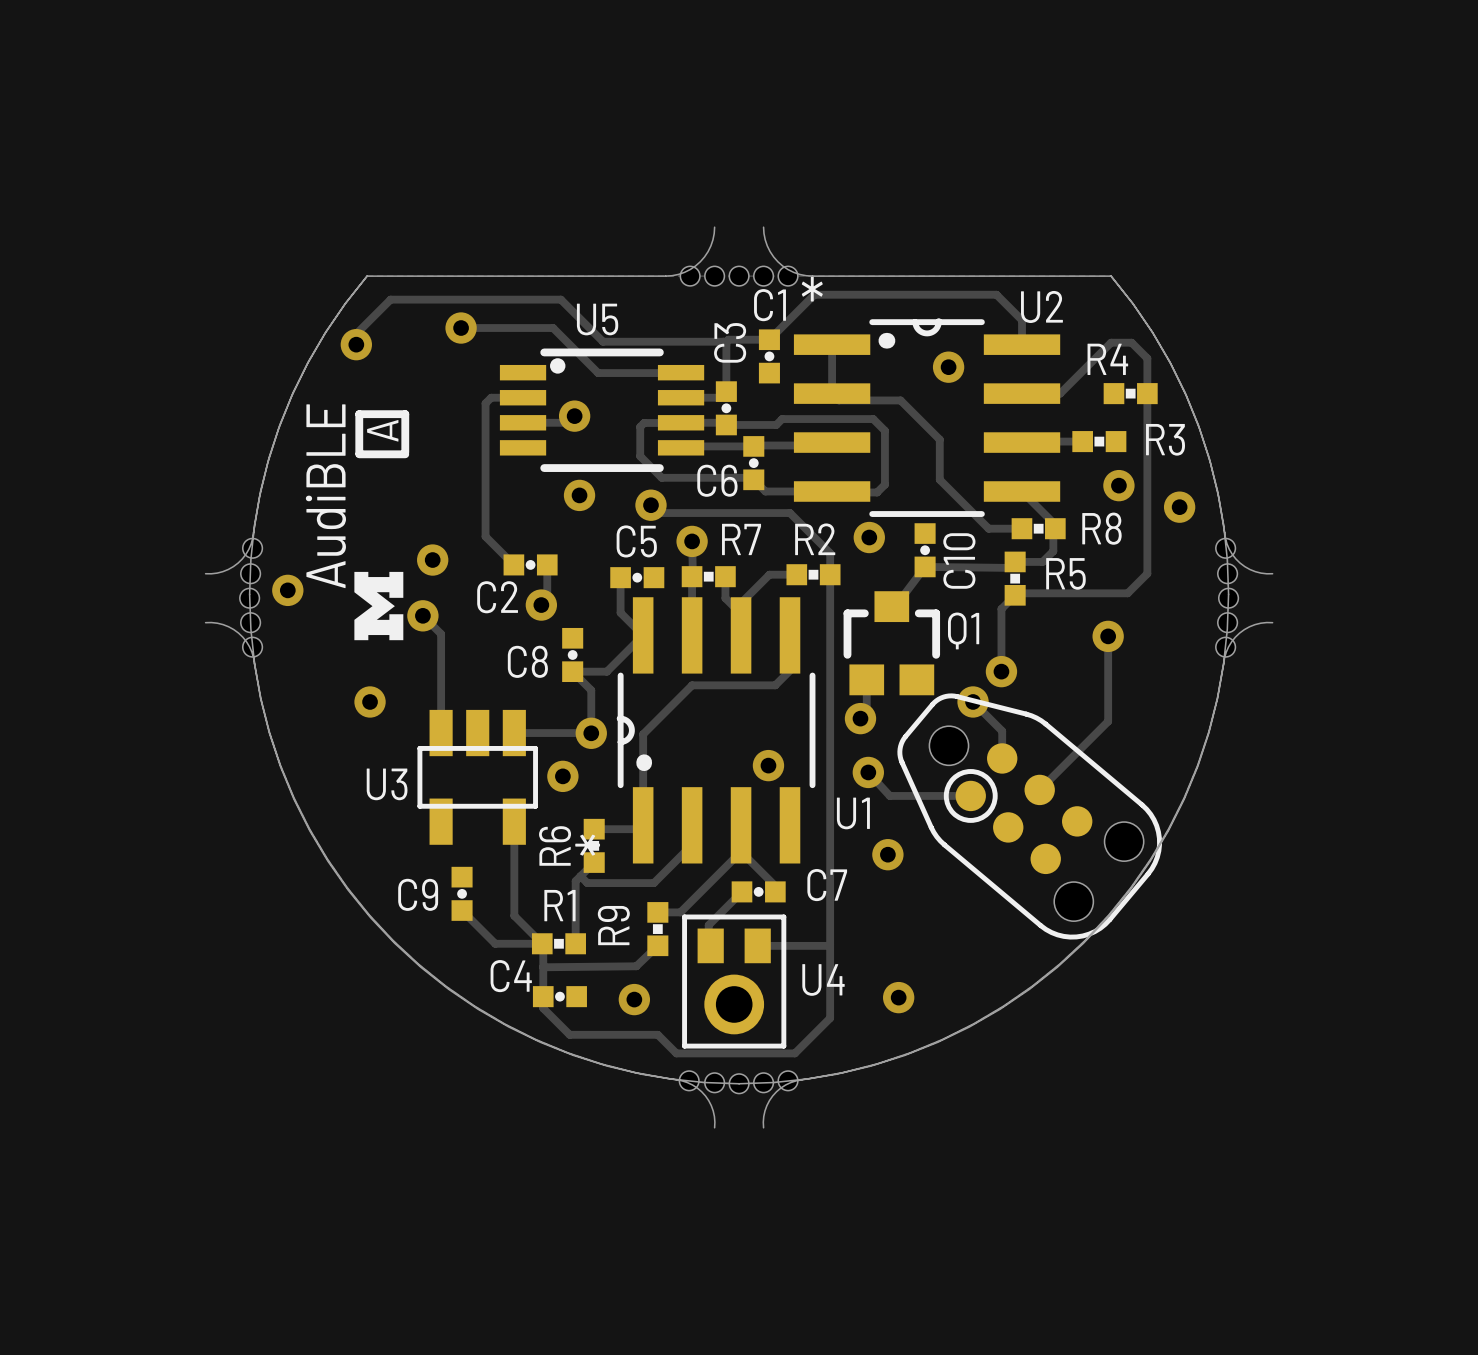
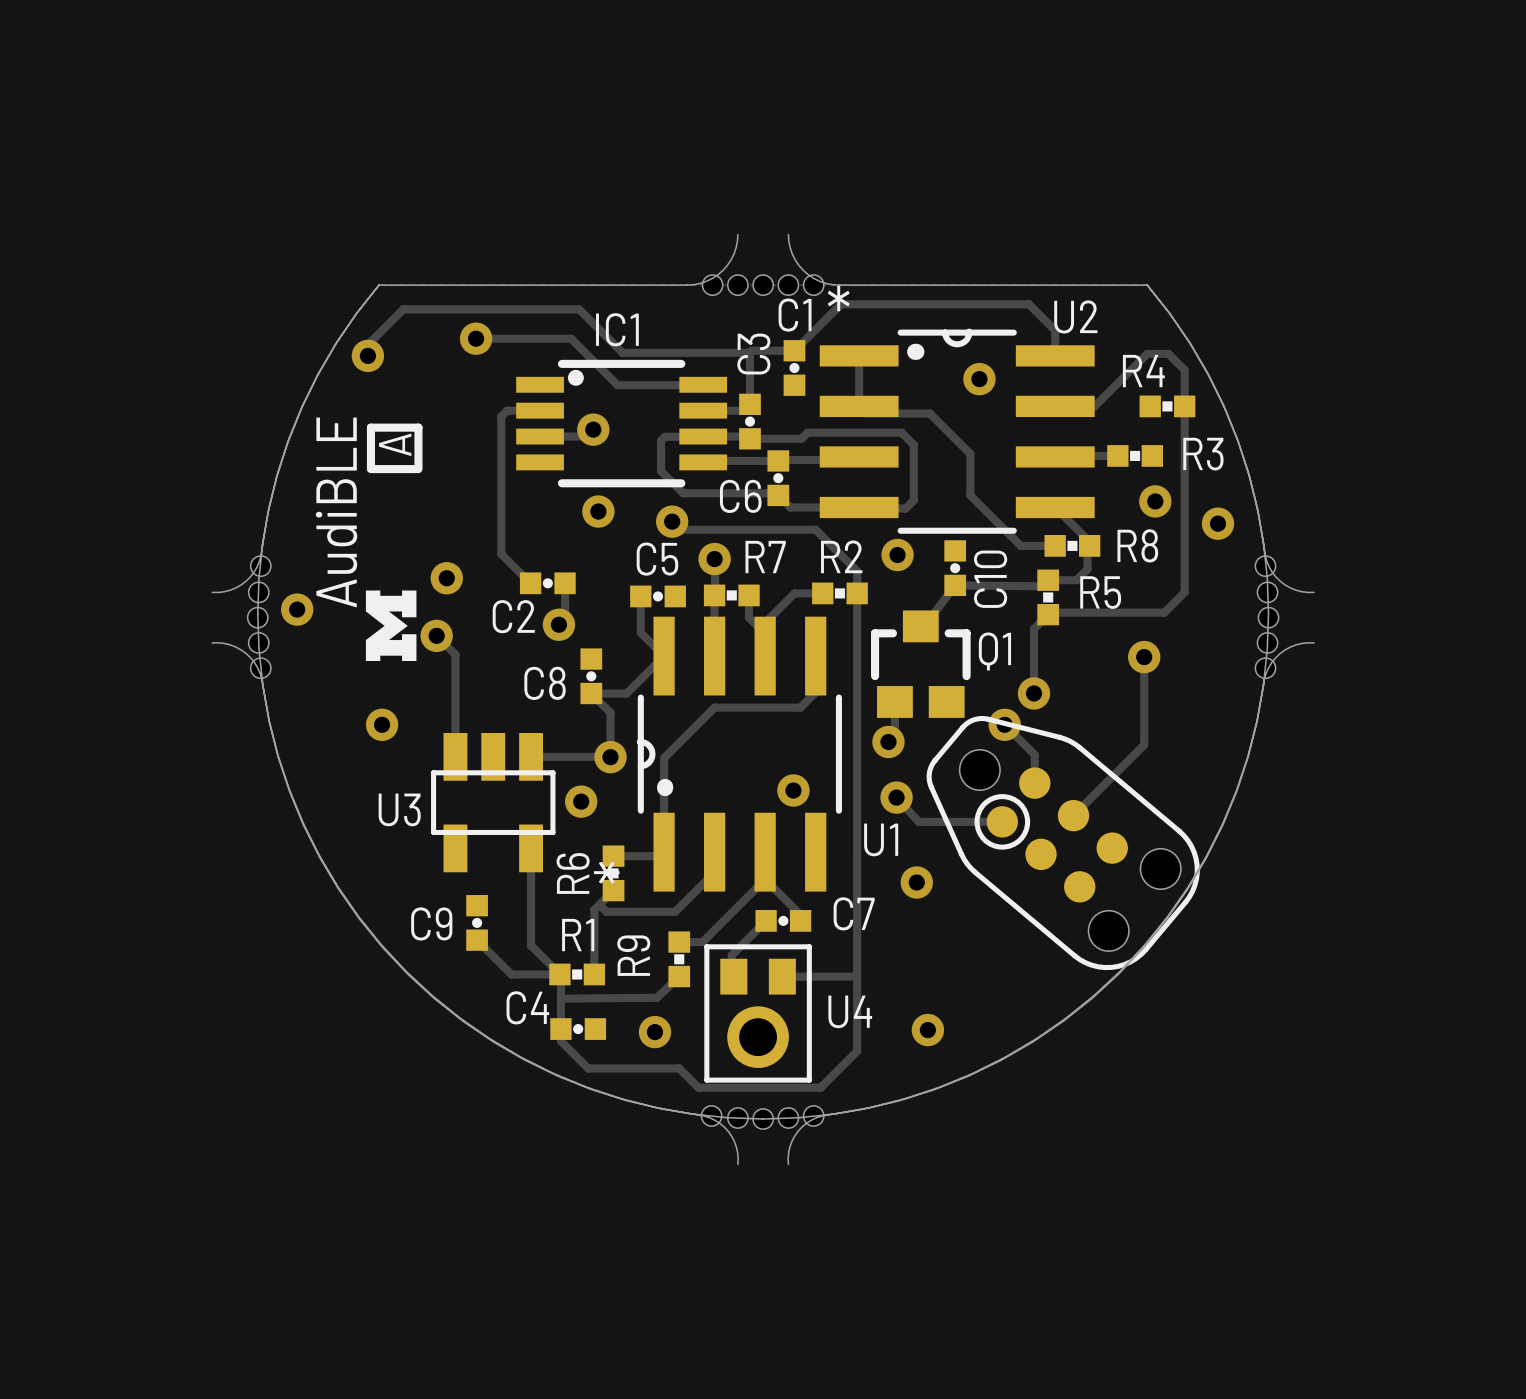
U5 name: U5 (597, 319) -> IC1 (617, 329)

